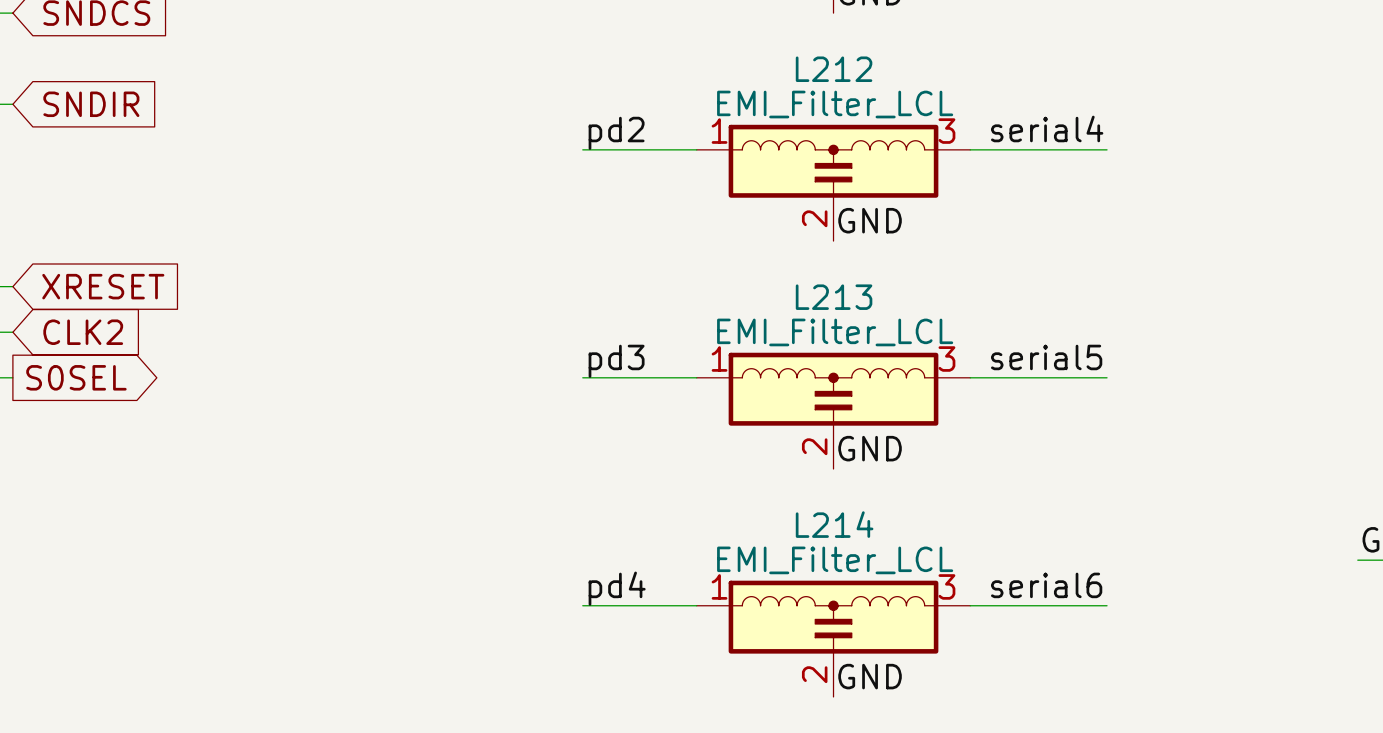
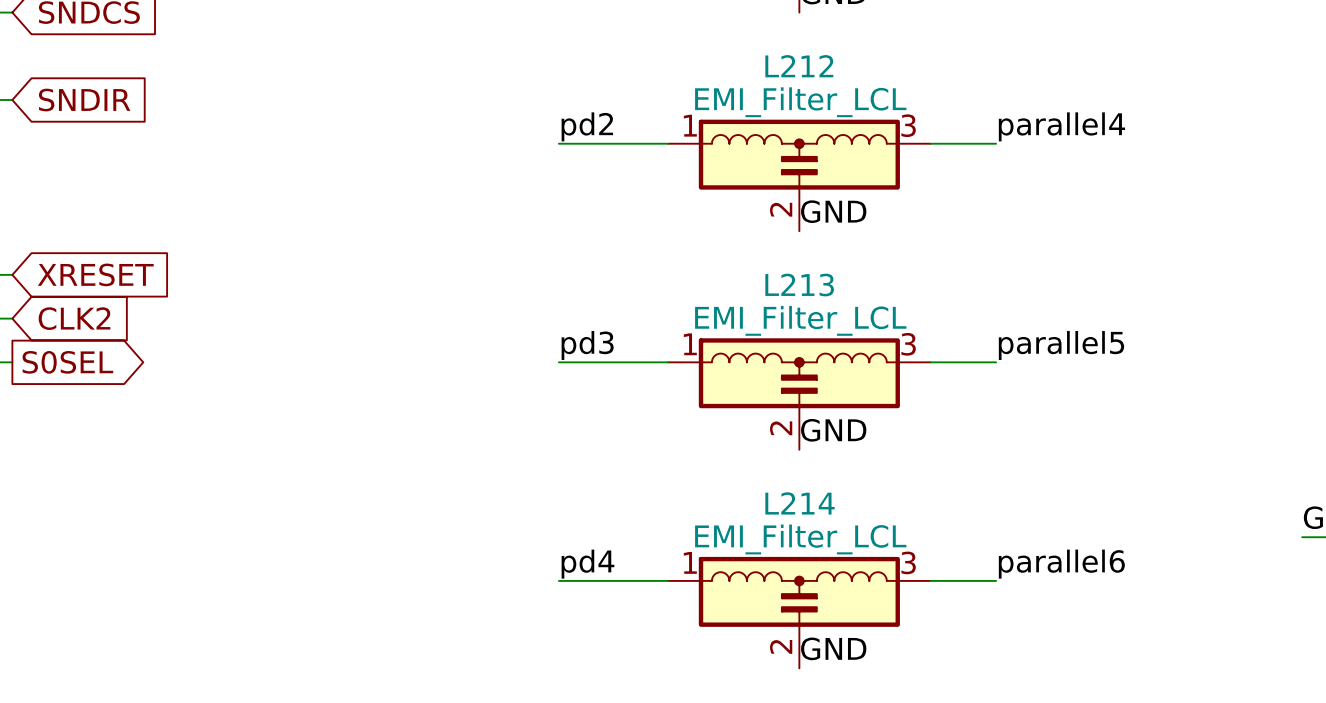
label: serial4 (1047, 128) -> none
label: none -> parallel4 (1061, 126)
wire: (1038, 149) (1107, 149) -> none
label: serial5 (1046, 357) -> none
label: none -> parallel5 (1061, 345)
wire: (1038, 377) (1107, 377) -> none
label: serial6 (1046, 585) -> none
label: none -> parallel6 (1061, 564)
wire: (1038, 605) (1107, 605) -> none

